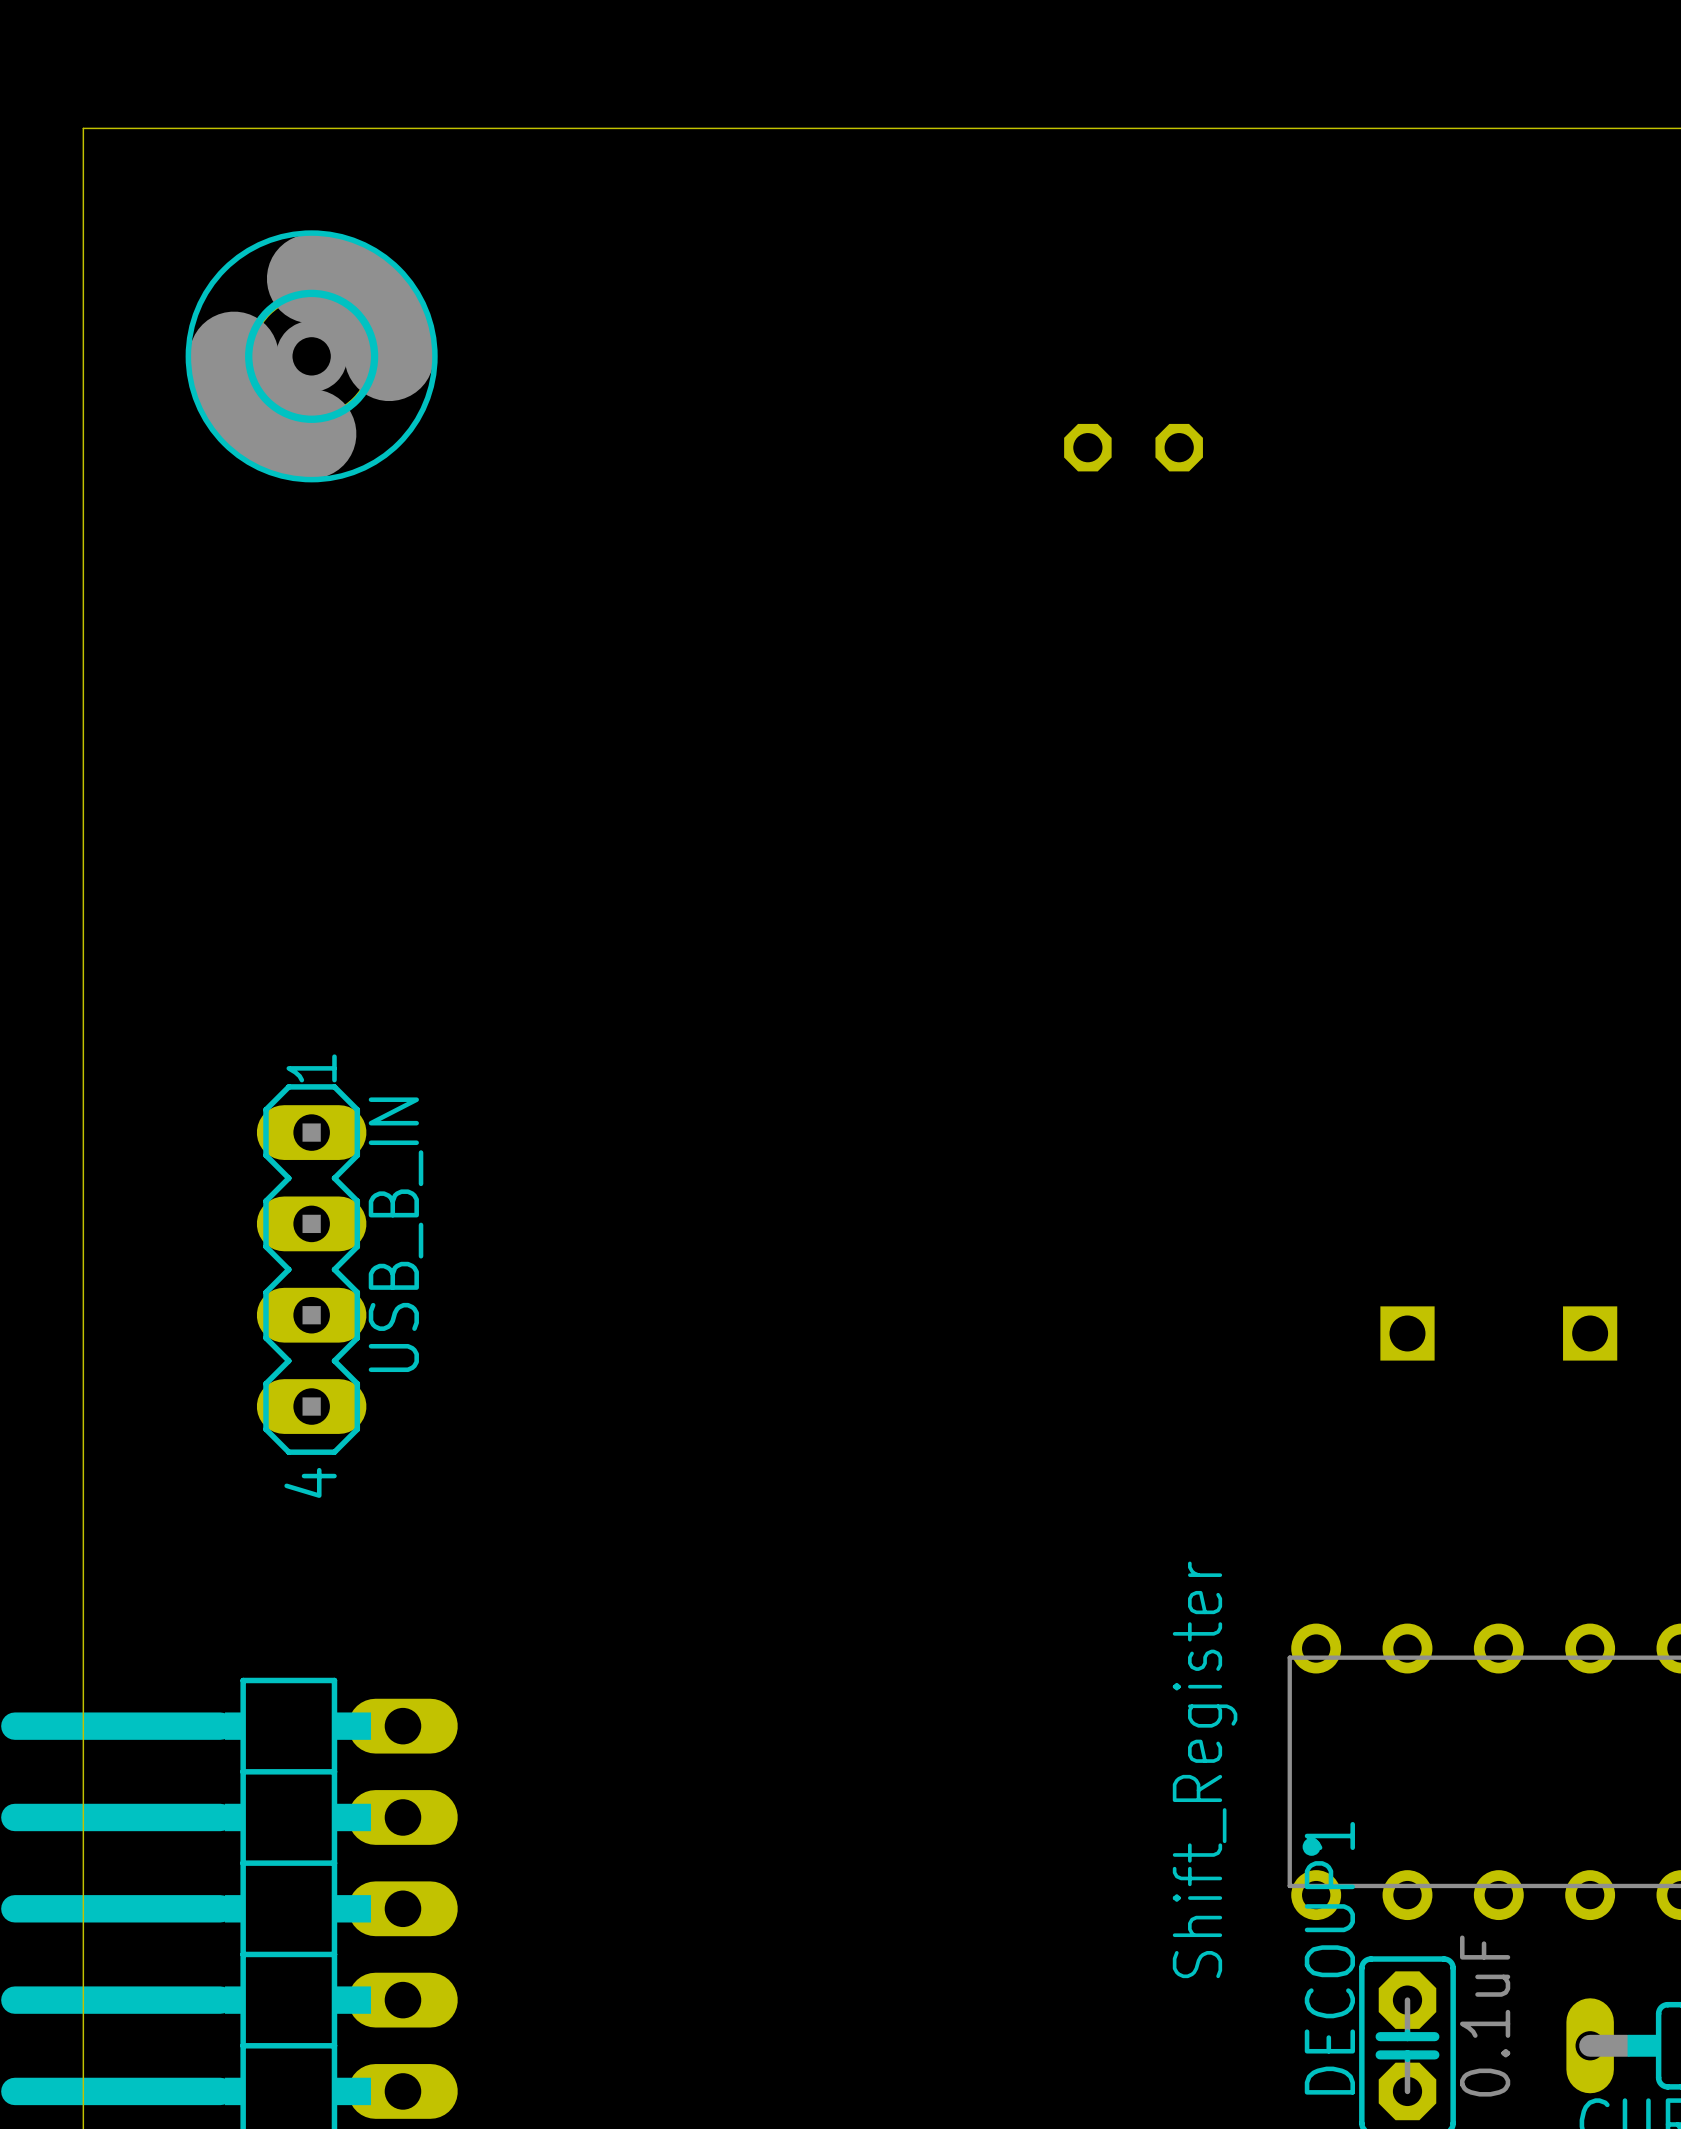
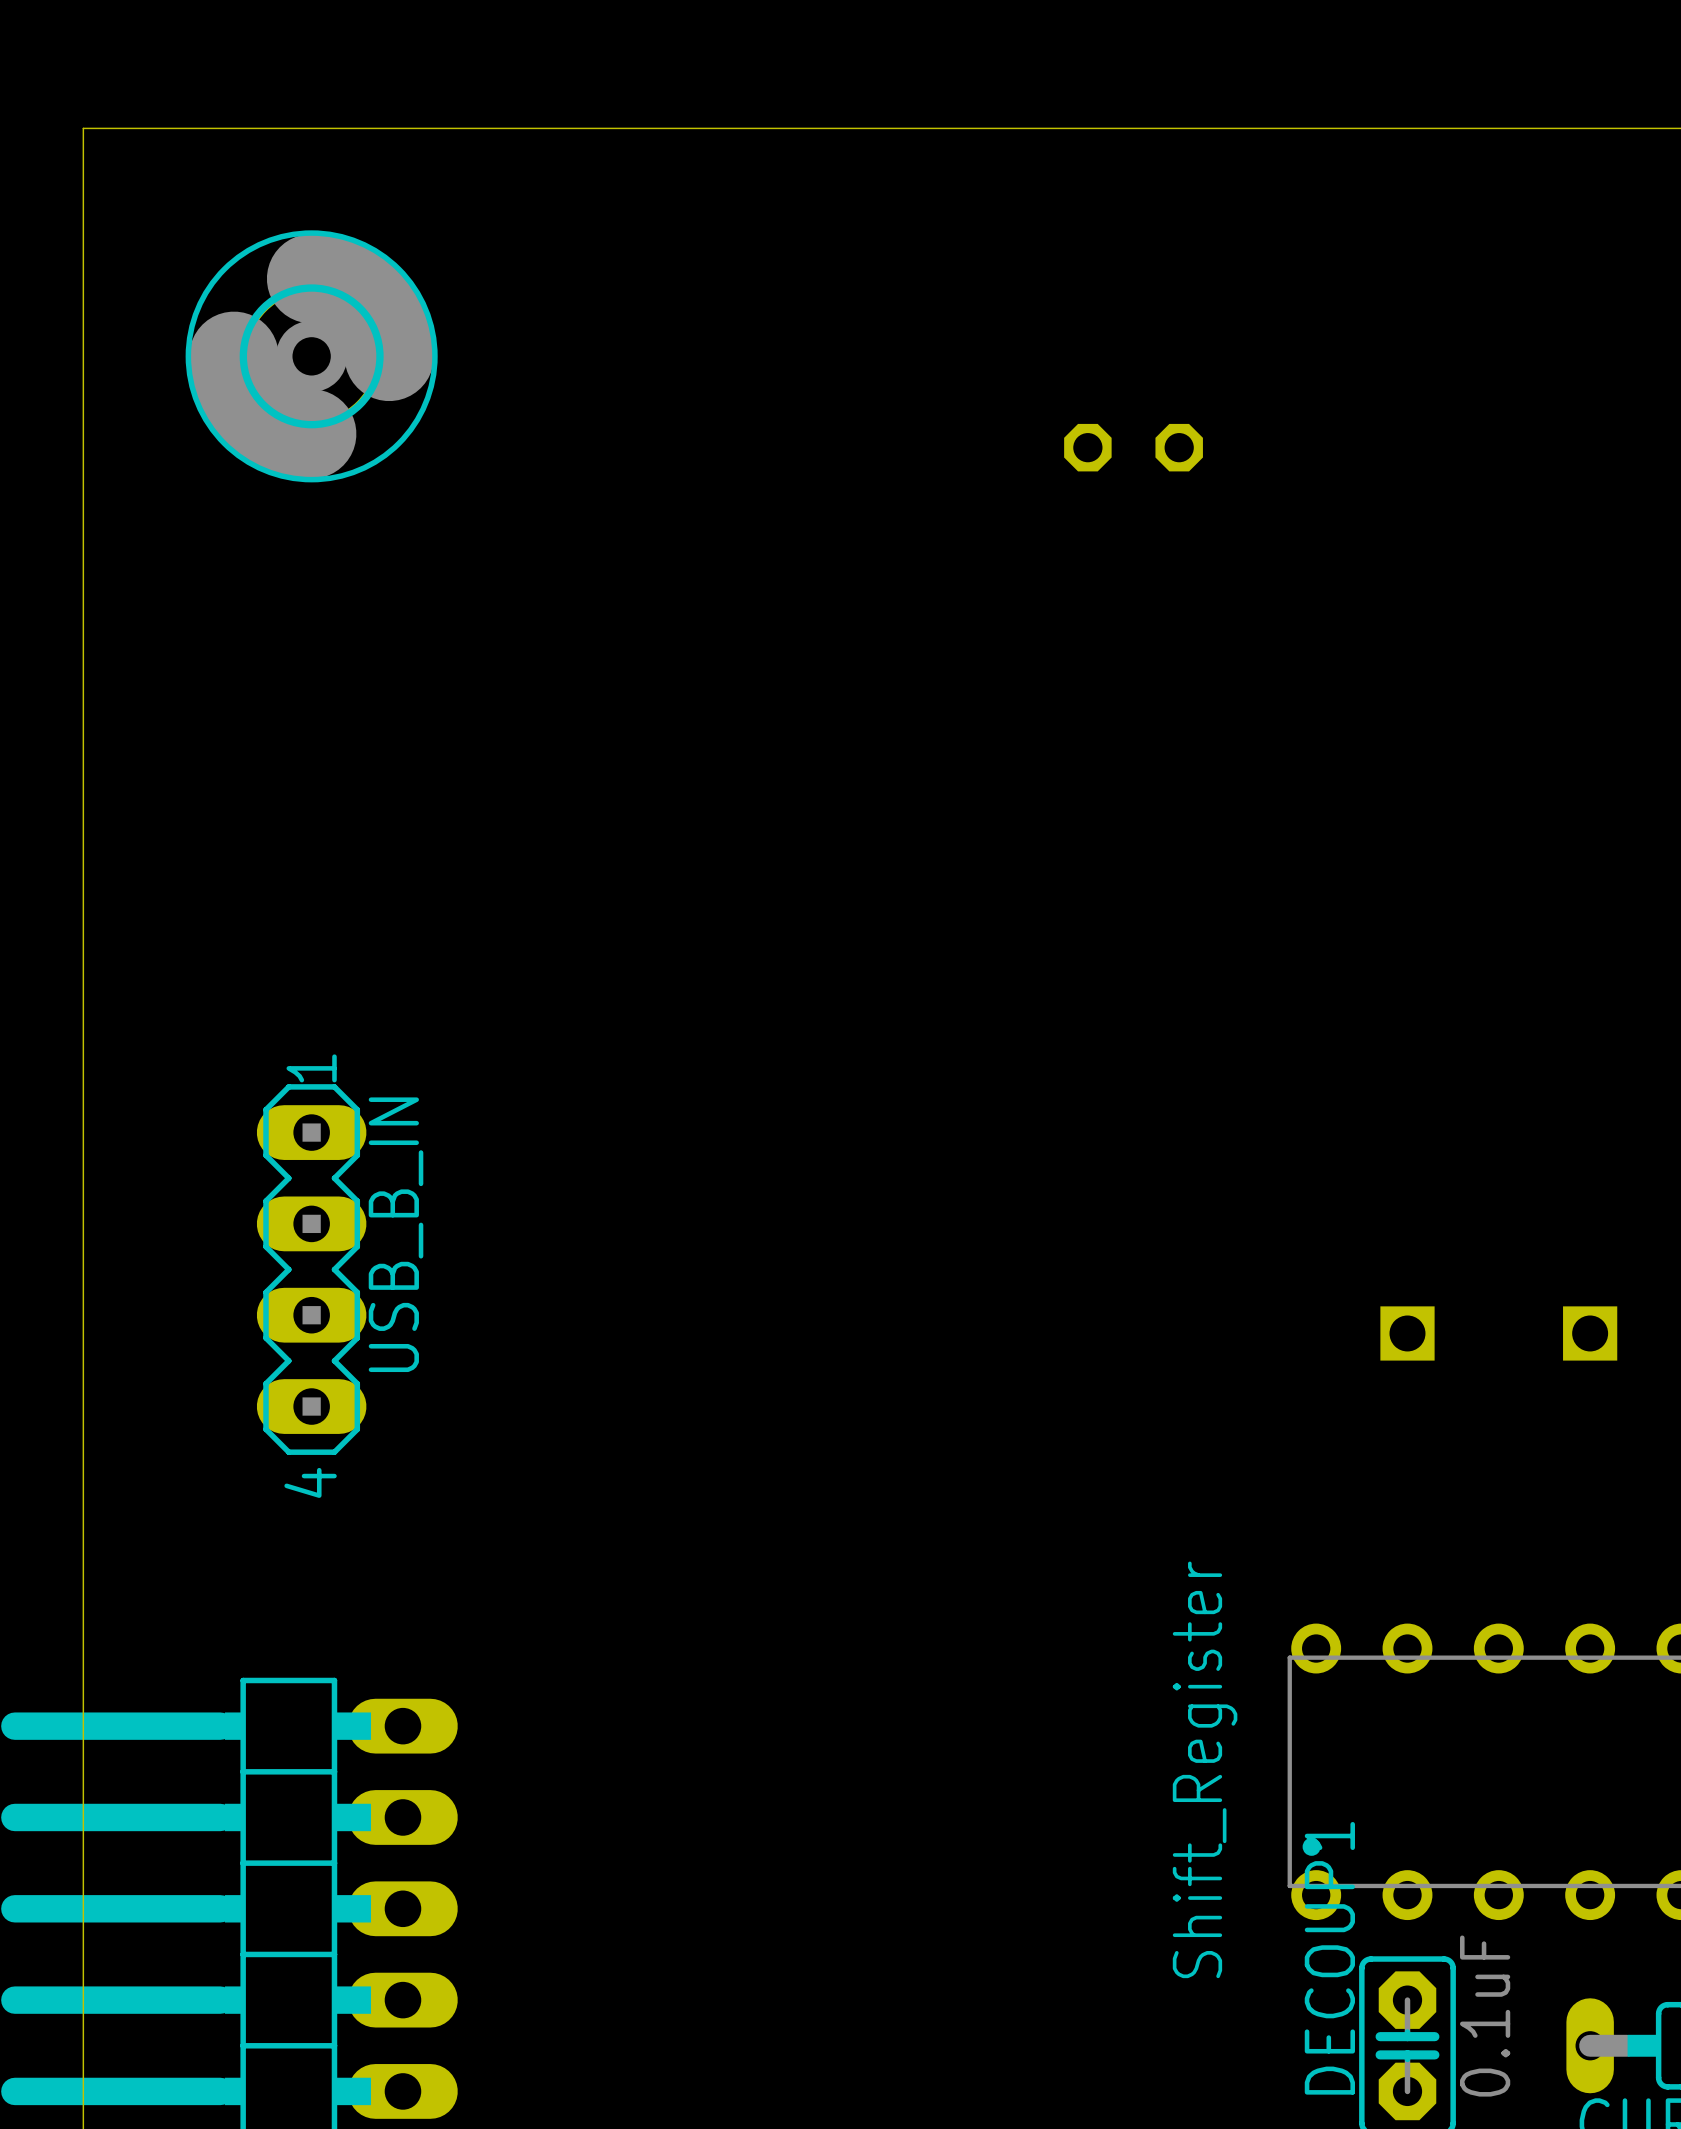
part footprint: [185, 230, 438, 483] -> [185, 230, 438, 483]

